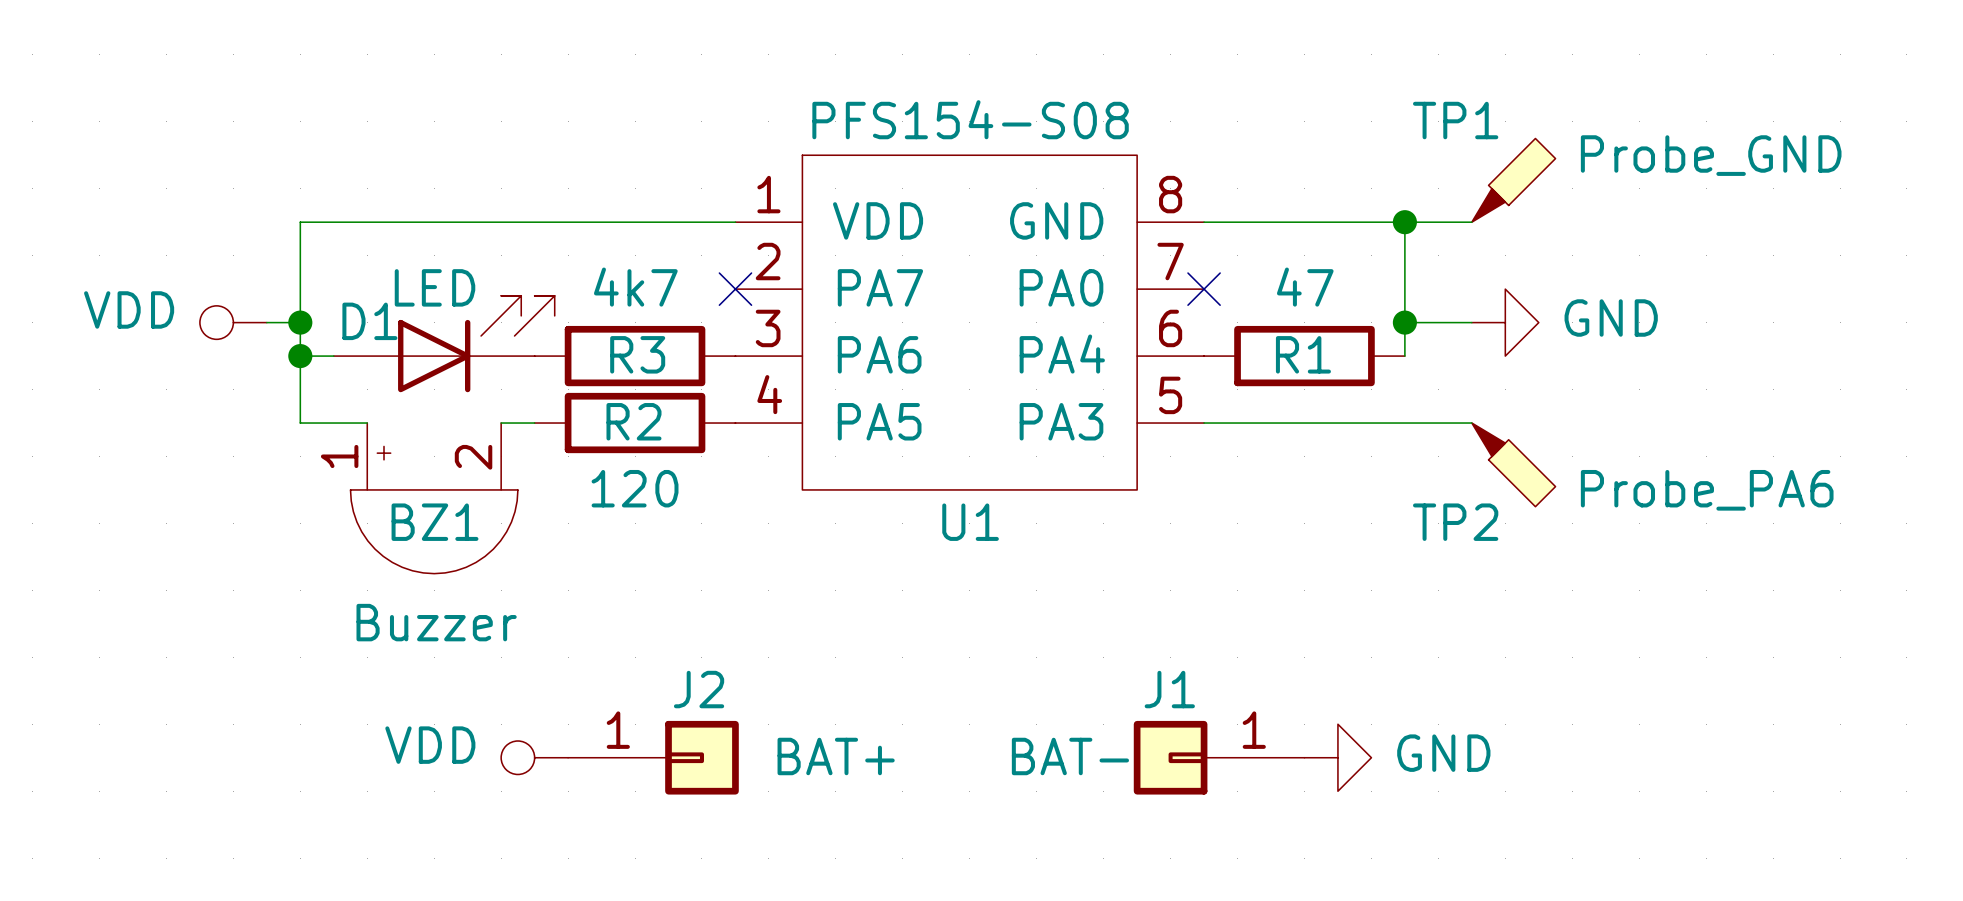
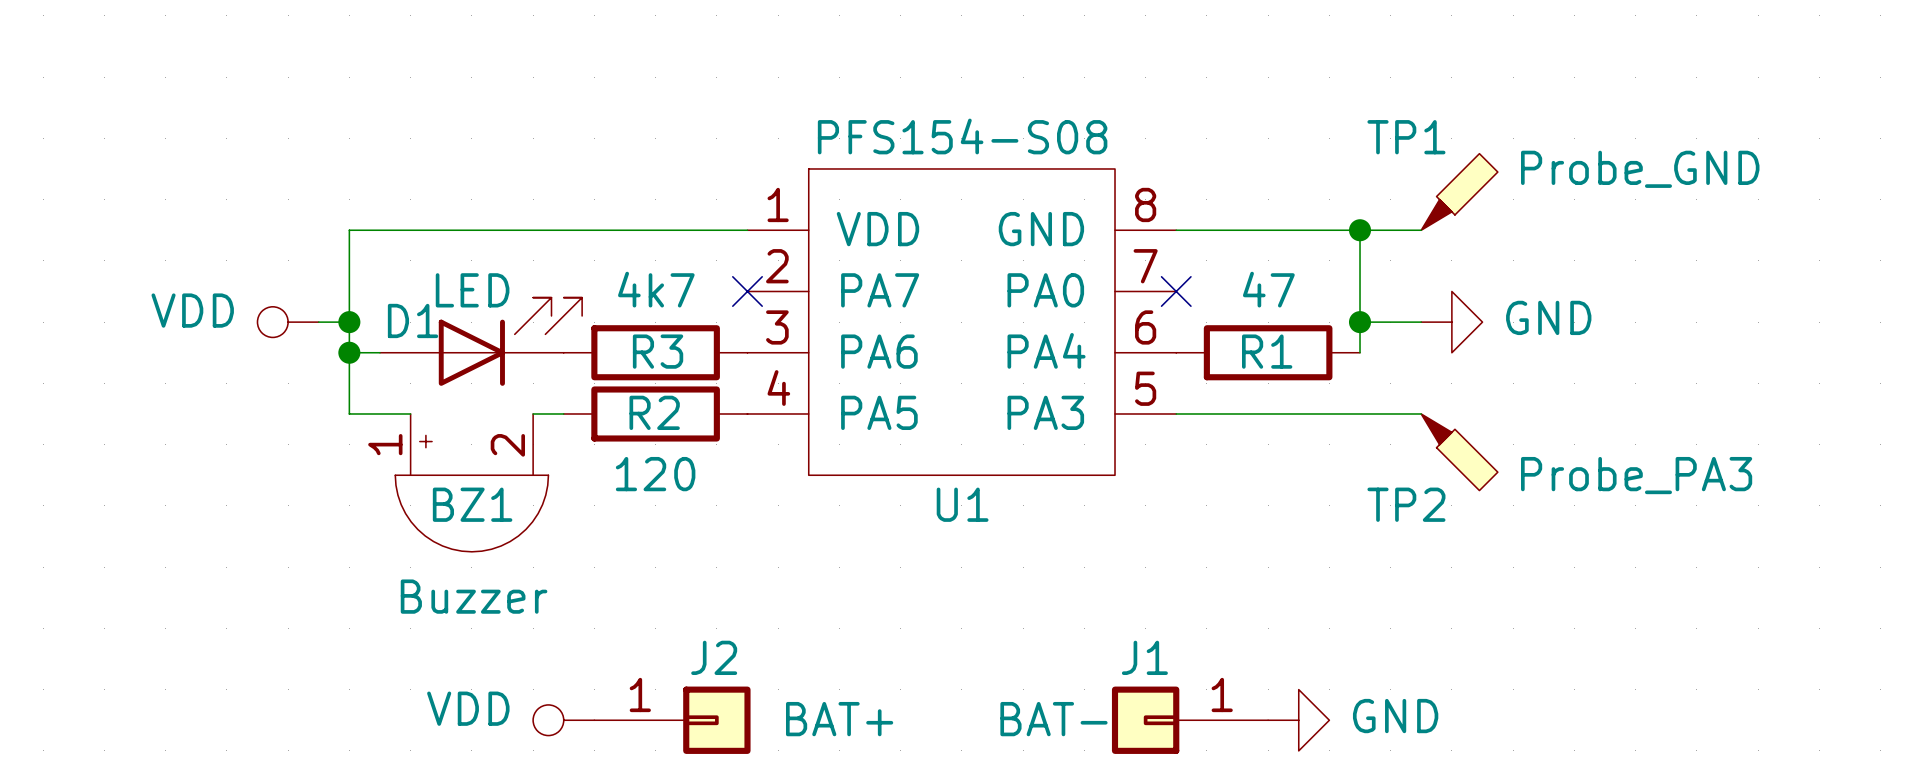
TP2 value: Probe_PA6 (1707, 490) -> Probe_PA3 (1636, 475)

